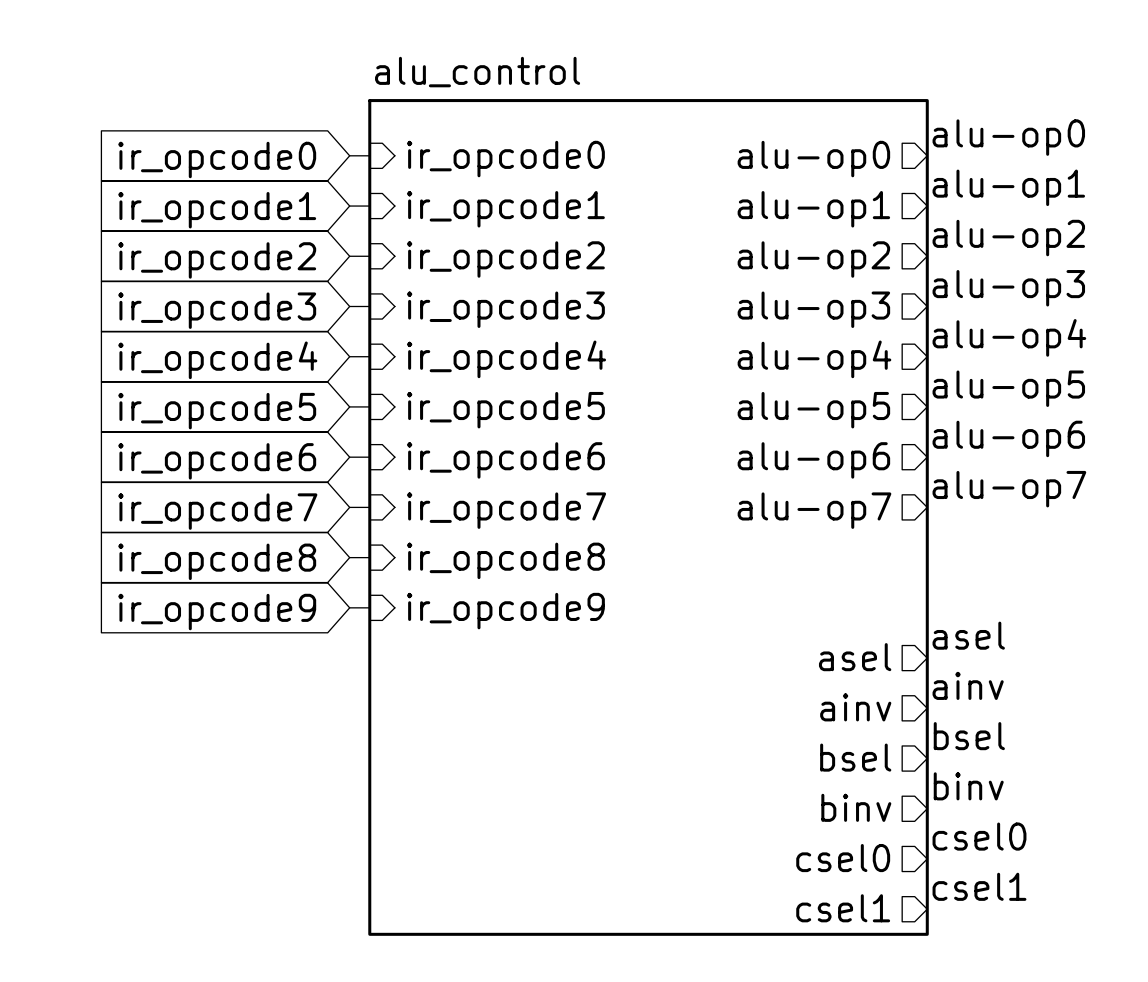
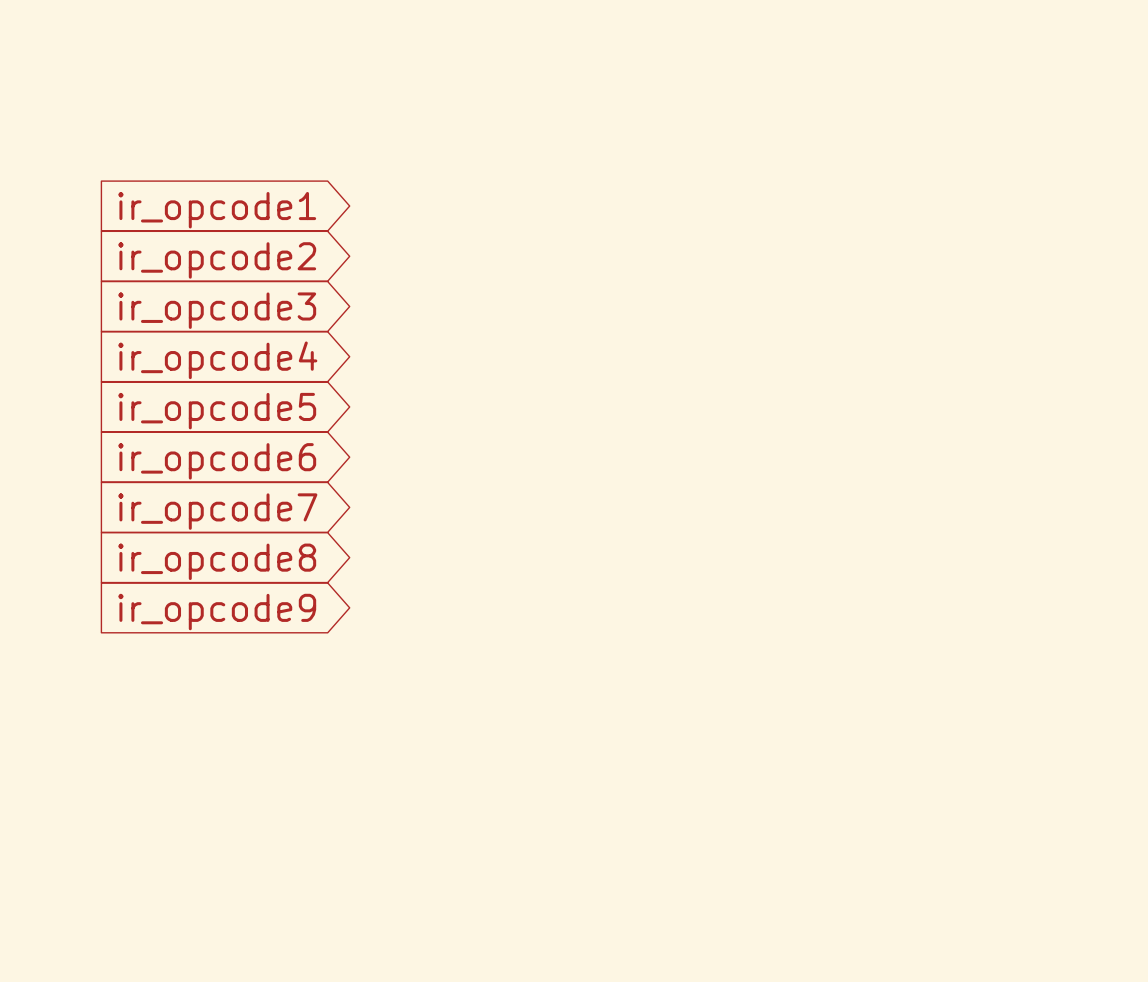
label: alu-op0 (1008, 137) -> none
wire: (349, 155) (369, 155) -> none
global label: ir_opcode0 (217, 159) -> none
sheet pin: ir_opcode0 (505, 159) -> none
sheet pin: alu-op0 (813, 159) -> none
label: alu-op1 (1008, 187) -> none
wire: (349, 206) (369, 206) -> none
sheet pin: ir_opcode1 (505, 209) -> none
sheet pin: alu-op1 (813, 209) -> none
label: alu-op2 (1008, 238) -> none
wire: (349, 256) (369, 256) -> none
sheet pin: ir_opcode2 (505, 259) -> none
sheet pin: alu-op2 (813, 259) -> none
label: alu-op3 (1008, 288) -> none
wire: (349, 306) (369, 306) -> none
sheet pin: ir_opcode3 (505, 309) -> none
sheet pin: alu-op3 (813, 309) -> none
label: alu-op4 (1009, 337) -> none
wire: (349, 356) (369, 356) -> none
sheet pin: ir_opcode4 (506, 359) -> none
sheet pin: alu-op4 (814, 359) -> none
label: alu-op5 (1008, 388) -> none
wire: (349, 406) (369, 406) -> none
sheet pin: ir_opcode5 (505, 410) -> none
sheet pin: alu-op5 (813, 410) -> none
label: alu-op6 (1008, 438) -> none
wire: (349, 457) (369, 457) -> none
sheet pin: ir_opcode6 (505, 460) -> none
sheet pin: alu-op6 (813, 460) -> none
label: alu-op7 (1009, 489) -> none
wire: (349, 507) (369, 507) -> none
sheet pin: ir_opcode7 (506, 510) -> none
sheet pin: alu-op7 (814, 510) -> none
sheet alu_control: (648, 517) -> none
wire: (349, 557) (369, 557) -> none
sheet pin: ir_opcode8 (505, 560) -> none
wire: (349, 607) (369, 607) -> none
sheet pin: ir_opcode9 (505, 611) -> none
label: asel (968, 635) -> none
sheet pin: asel (855, 657) -> none
label: ainv (968, 685) -> none
sheet pin: ainv (855, 707) -> none
label: bsel (969, 736) -> none
sheet pin: bsel (855, 757) -> none
label: binv (968, 786) -> none
sheet pin: binv (856, 807) -> none
label: csel0 (979, 836) -> none
sheet pin: csel0 (843, 858) -> none
label: csel1 (979, 886) -> none
sheet pin: csel1 (843, 908) -> none

